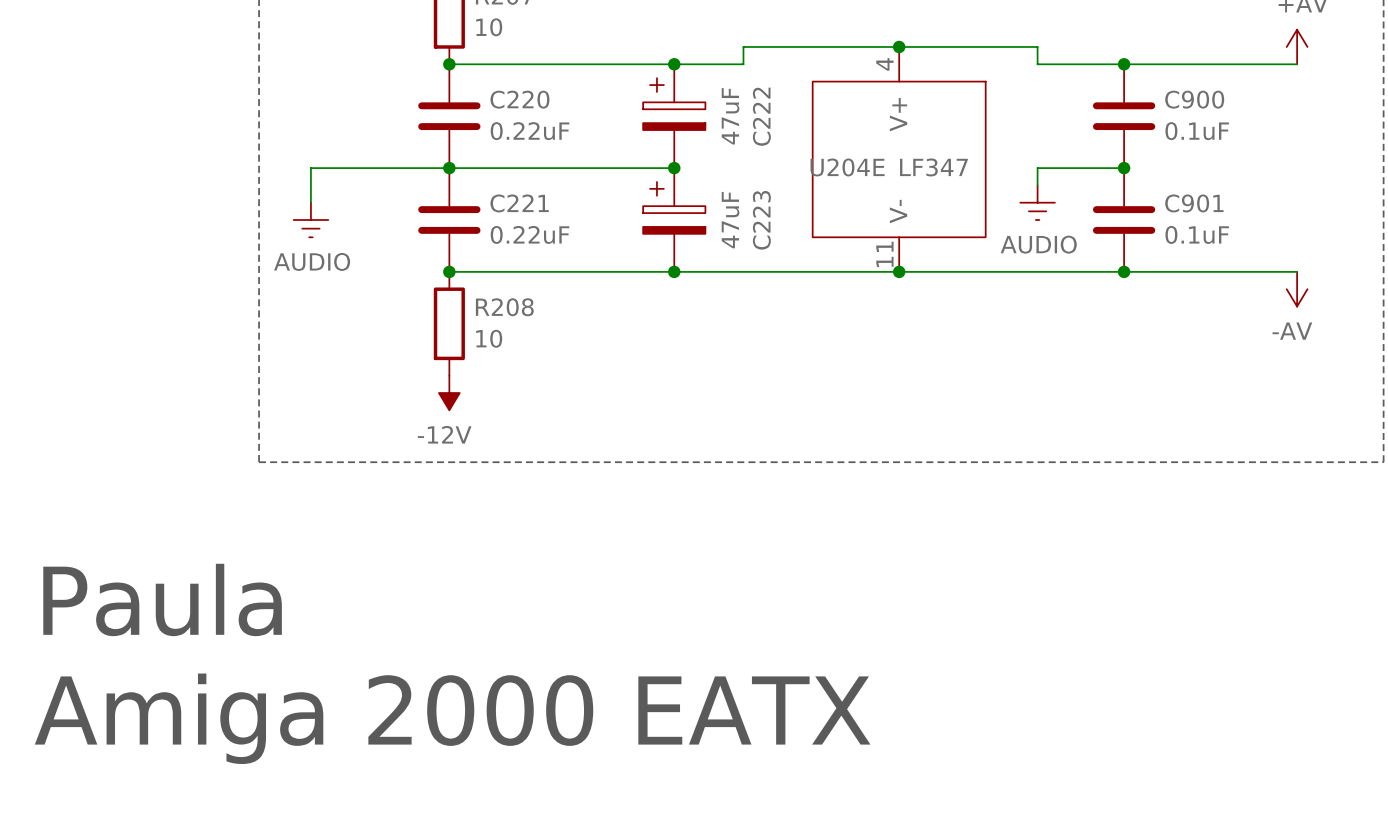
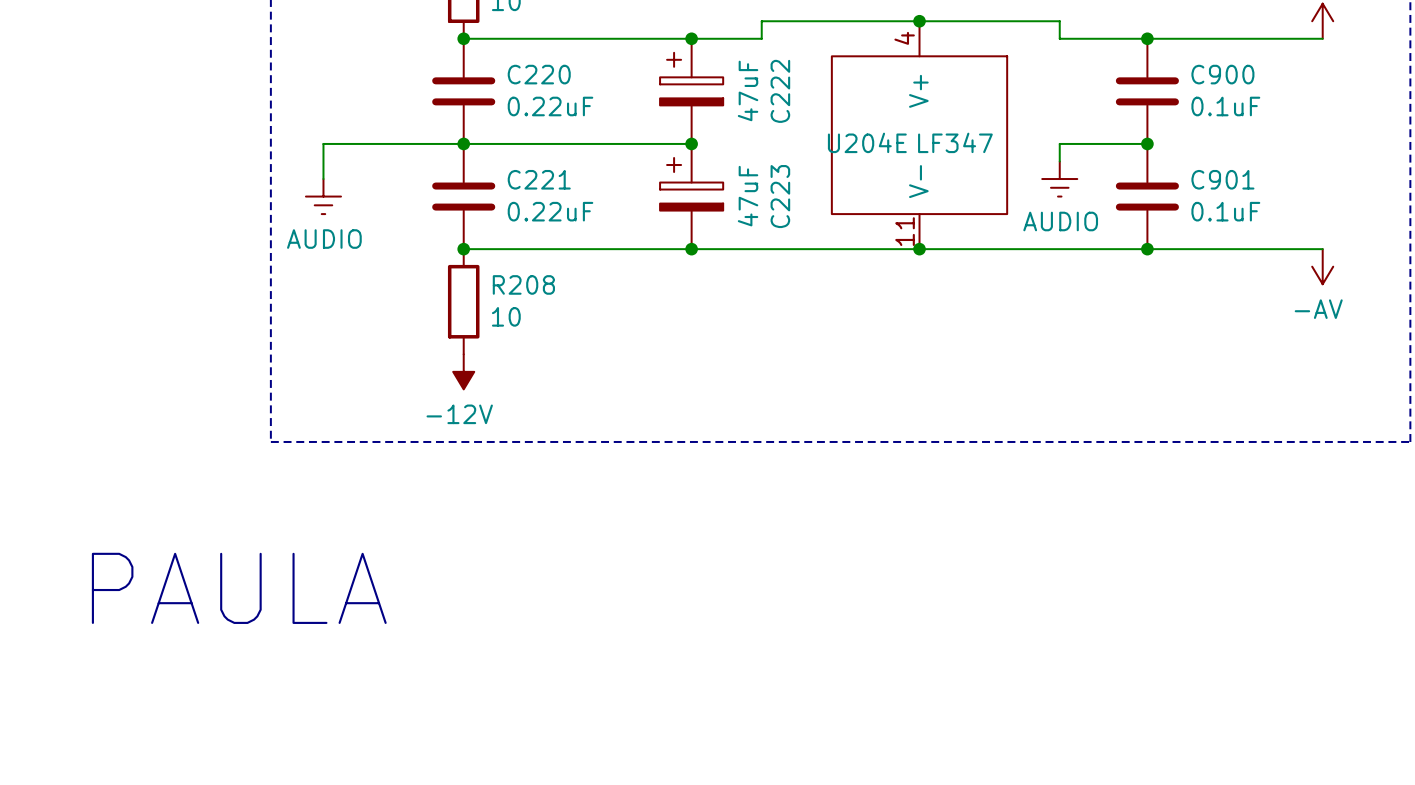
text: Paula (162, 599) -> none
text: none -> PAULA (239, 588)
text: Amiga 2000 EATX (452, 718) -> none

